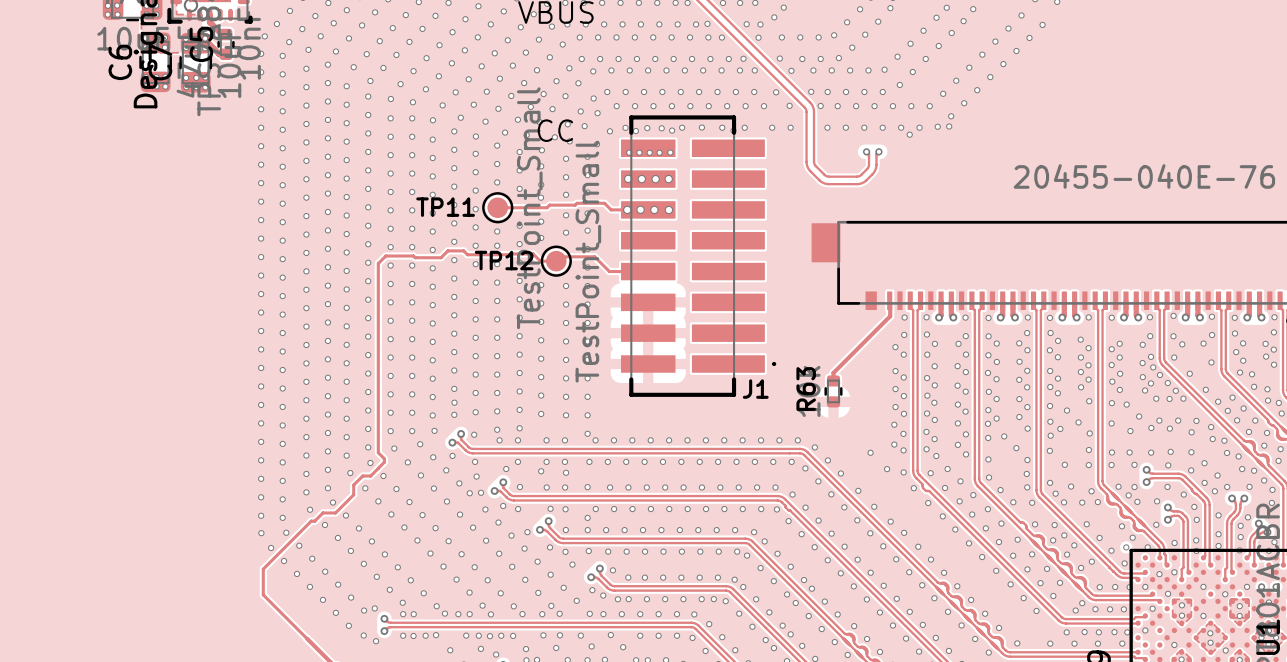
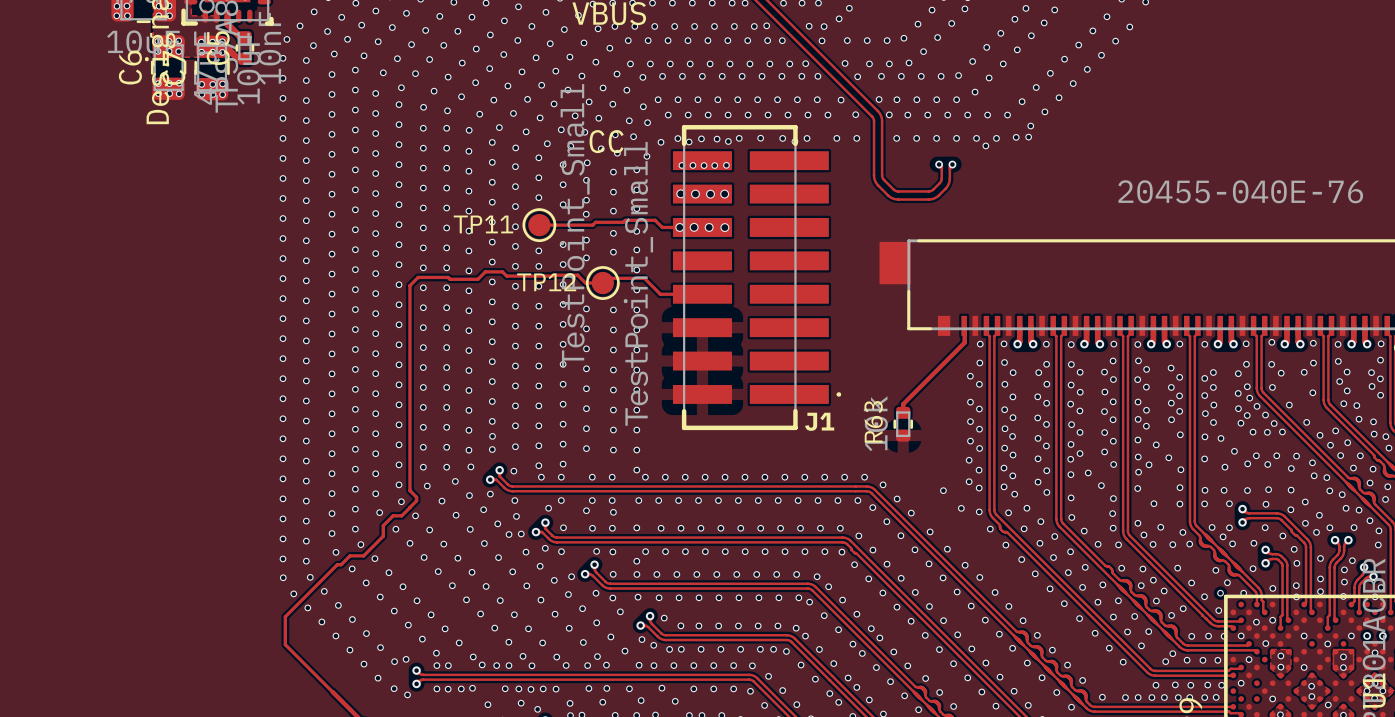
via: none -> (1125, 697)
via: none -> (1151, 697)
via: none -> (1178, 697)
via: none -> (1204, 697)

